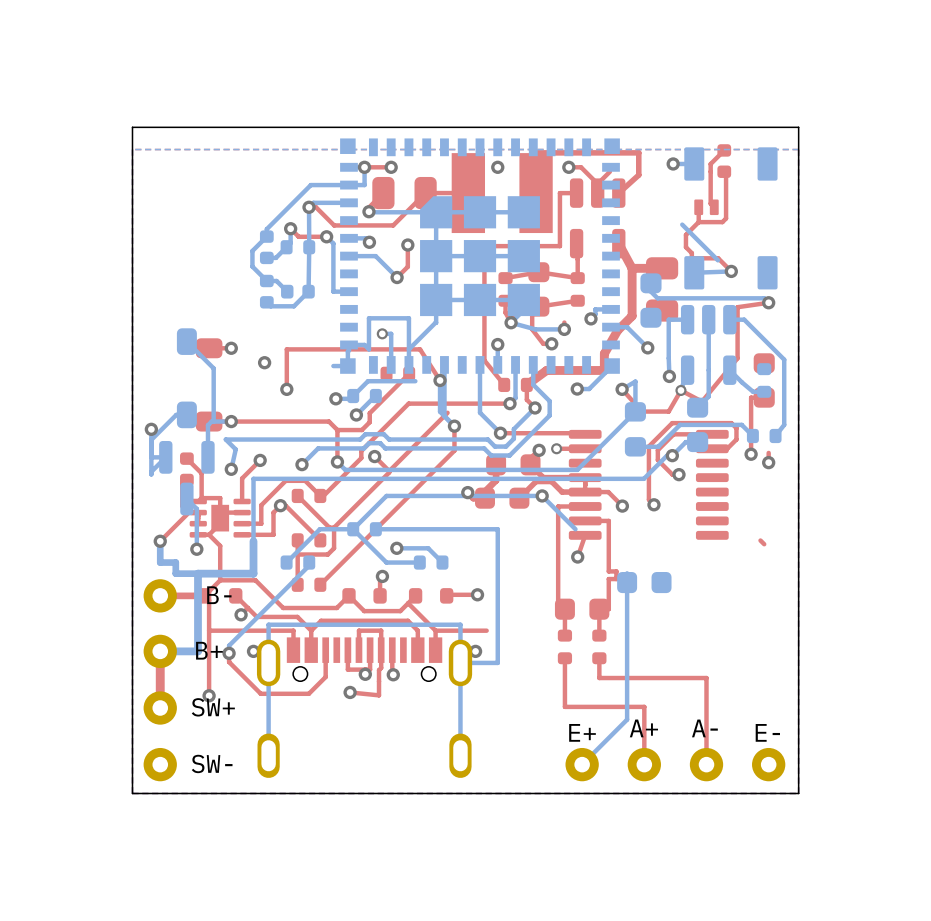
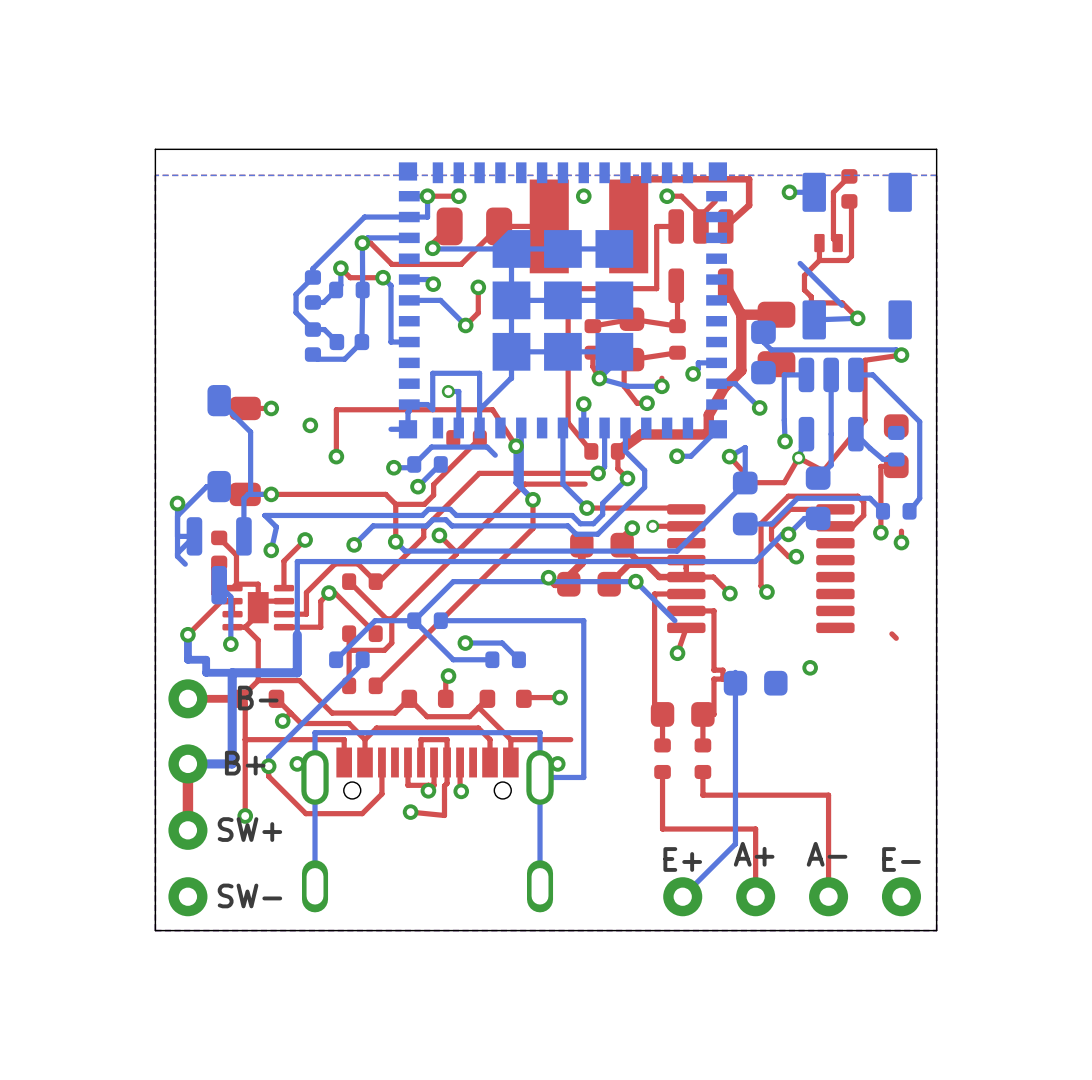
bottom track: none -> (487, 447) (495, 455)
top track: none -> (585, 484) (524, 484)
bottom track: none -> (177, 556) (185, 564)
via: none -> (810, 667)

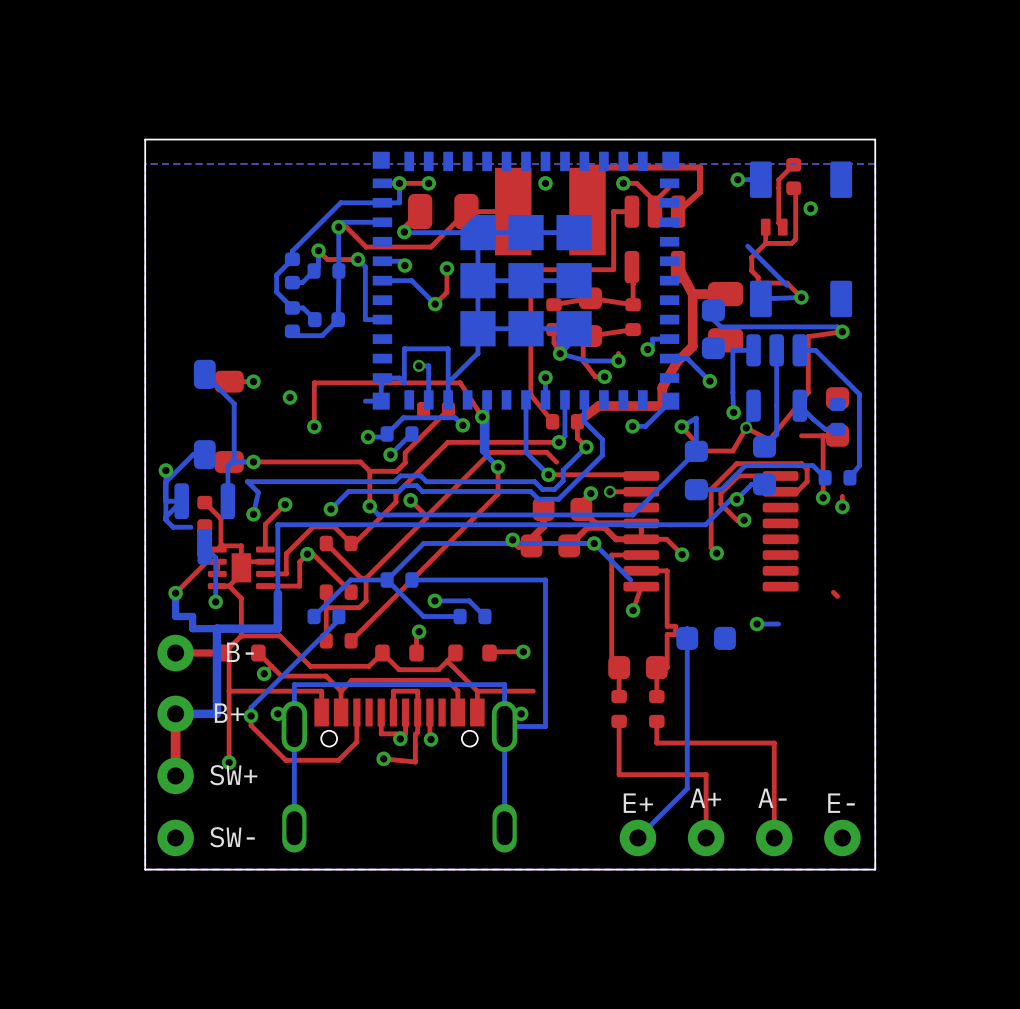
via: none -> (810, 208)
via: none -> (462, 425)
top track: none -> (823, 435) (801, 435)
top track: none -> (546, 452) (556, 462)
bottom track: none -> (190, 527) (173, 527)
bottom track: none -> (778, 624) (757, 624)

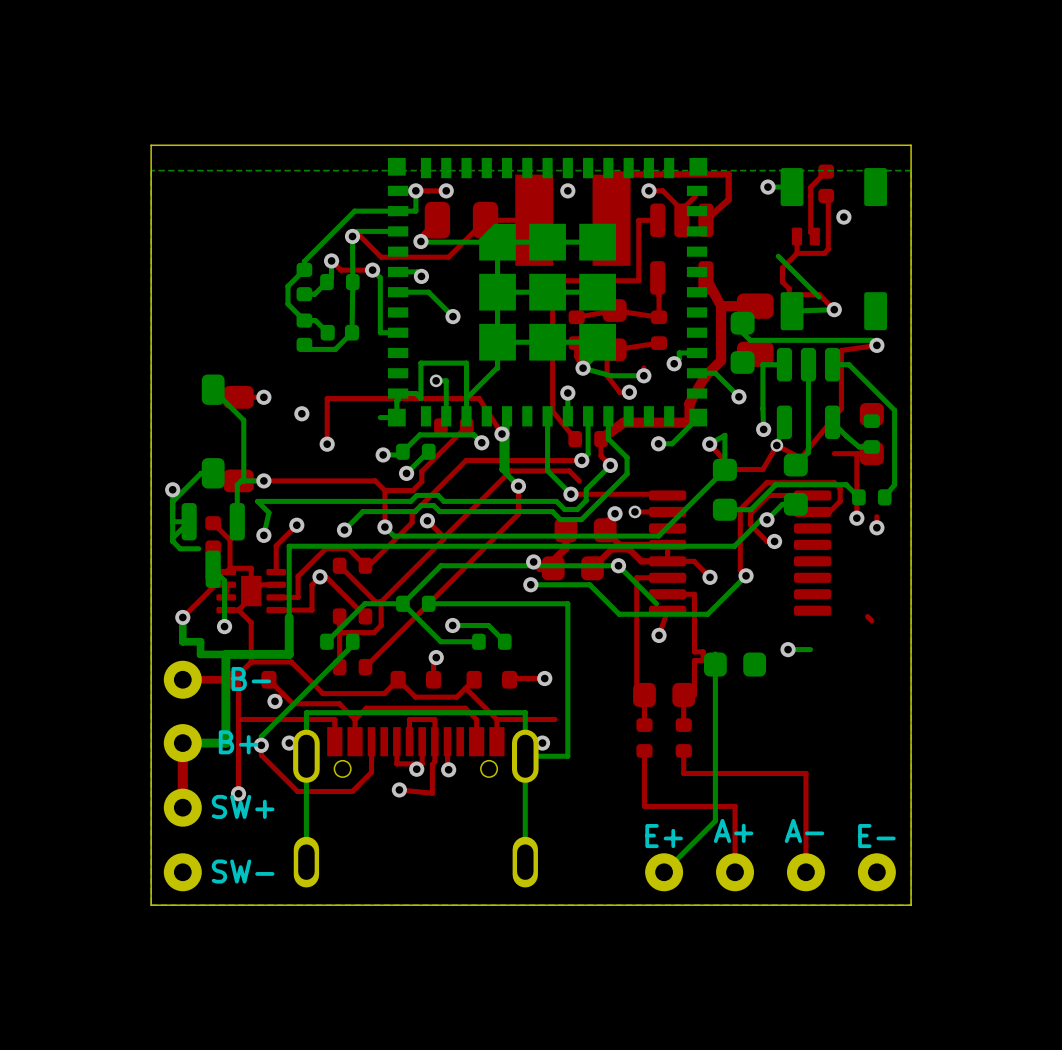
top track: (446, 268) (446, 292) (435, 304) -> none
via: (446, 268) -> none
bottom track: none -> (746, 575) (707, 614) (619, 614) (589, 584) (530, 584)
via: none -> (530, 584)

